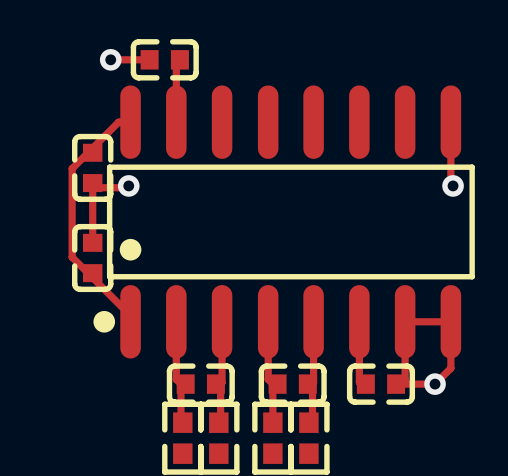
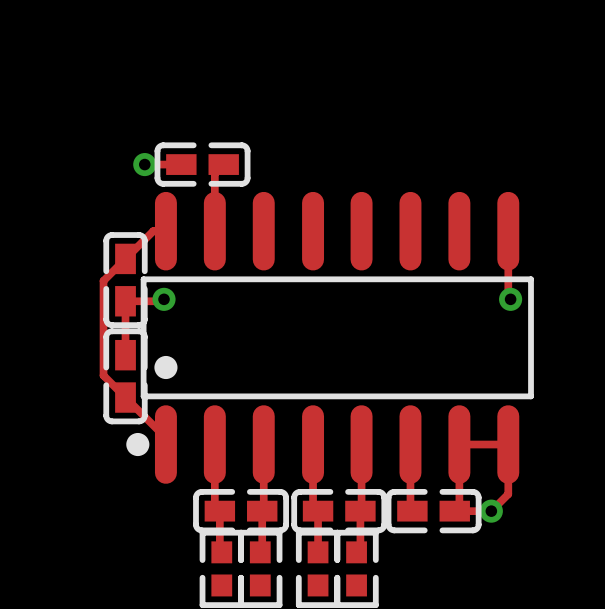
part footprint: [130, 39, 199, 81] -> [154, 142, 251, 187]
part footprint: [72, 133, 114, 202] -> [103, 232, 148, 329]
part footprint: [72, 223, 114, 293] -> [103, 328, 148, 425]
part footprint: [166, 363, 235, 405] -> [193, 488, 289, 534]
part footprint: [258, 363, 327, 405] -> [291, 488, 388, 534]
part footprint: [346, 363, 416, 405] -> [385, 488, 482, 534]

